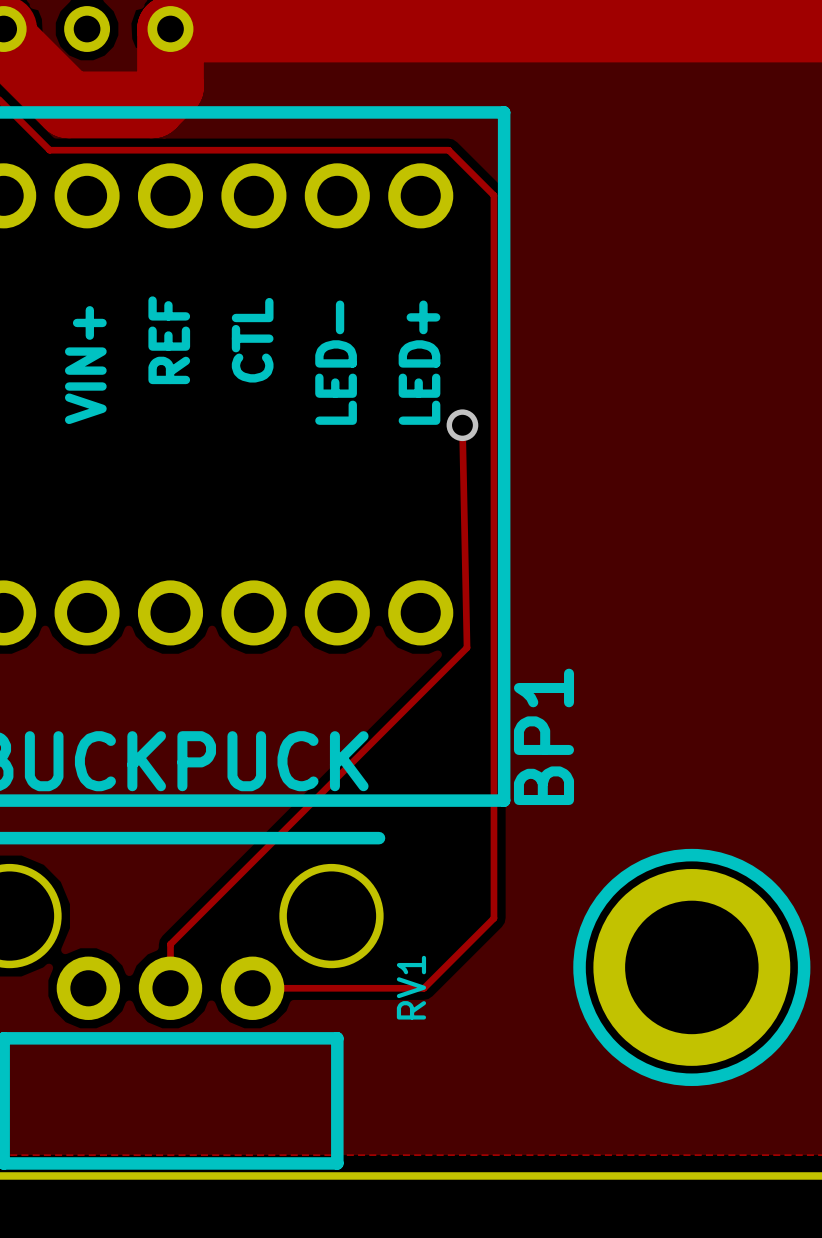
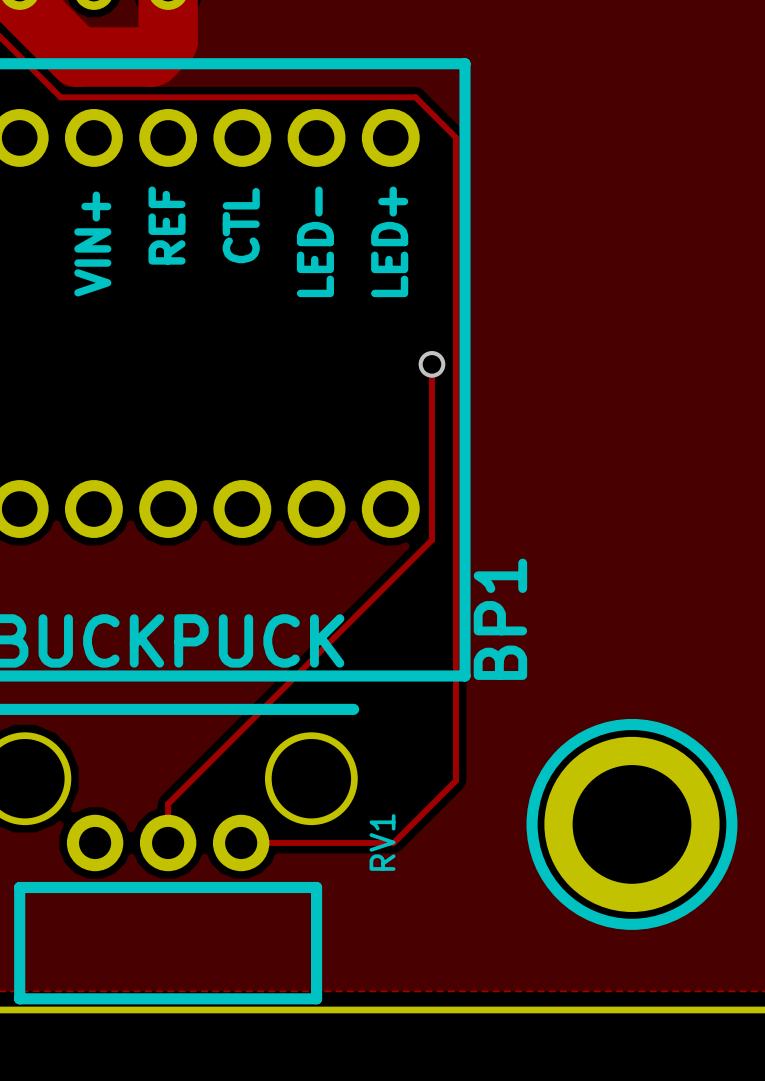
BP1 text position: REF (169, 340) -> REF (167, 225)
BP1 text position: CTL (252, 340) -> CTL (241, 225)
BP1 text position: LED- (336, 362) -> LED- (315, 241)
BP1 text position: LED+ (419, 362) -> LED+ (389, 241)
BP1 text position: VIN+ (85, 365) -> VIN+ (92, 243)
track: (462, 425) (467, 647) -> (431, 364) (431, 540)
via position: (462, 425) -> (431, 364)

